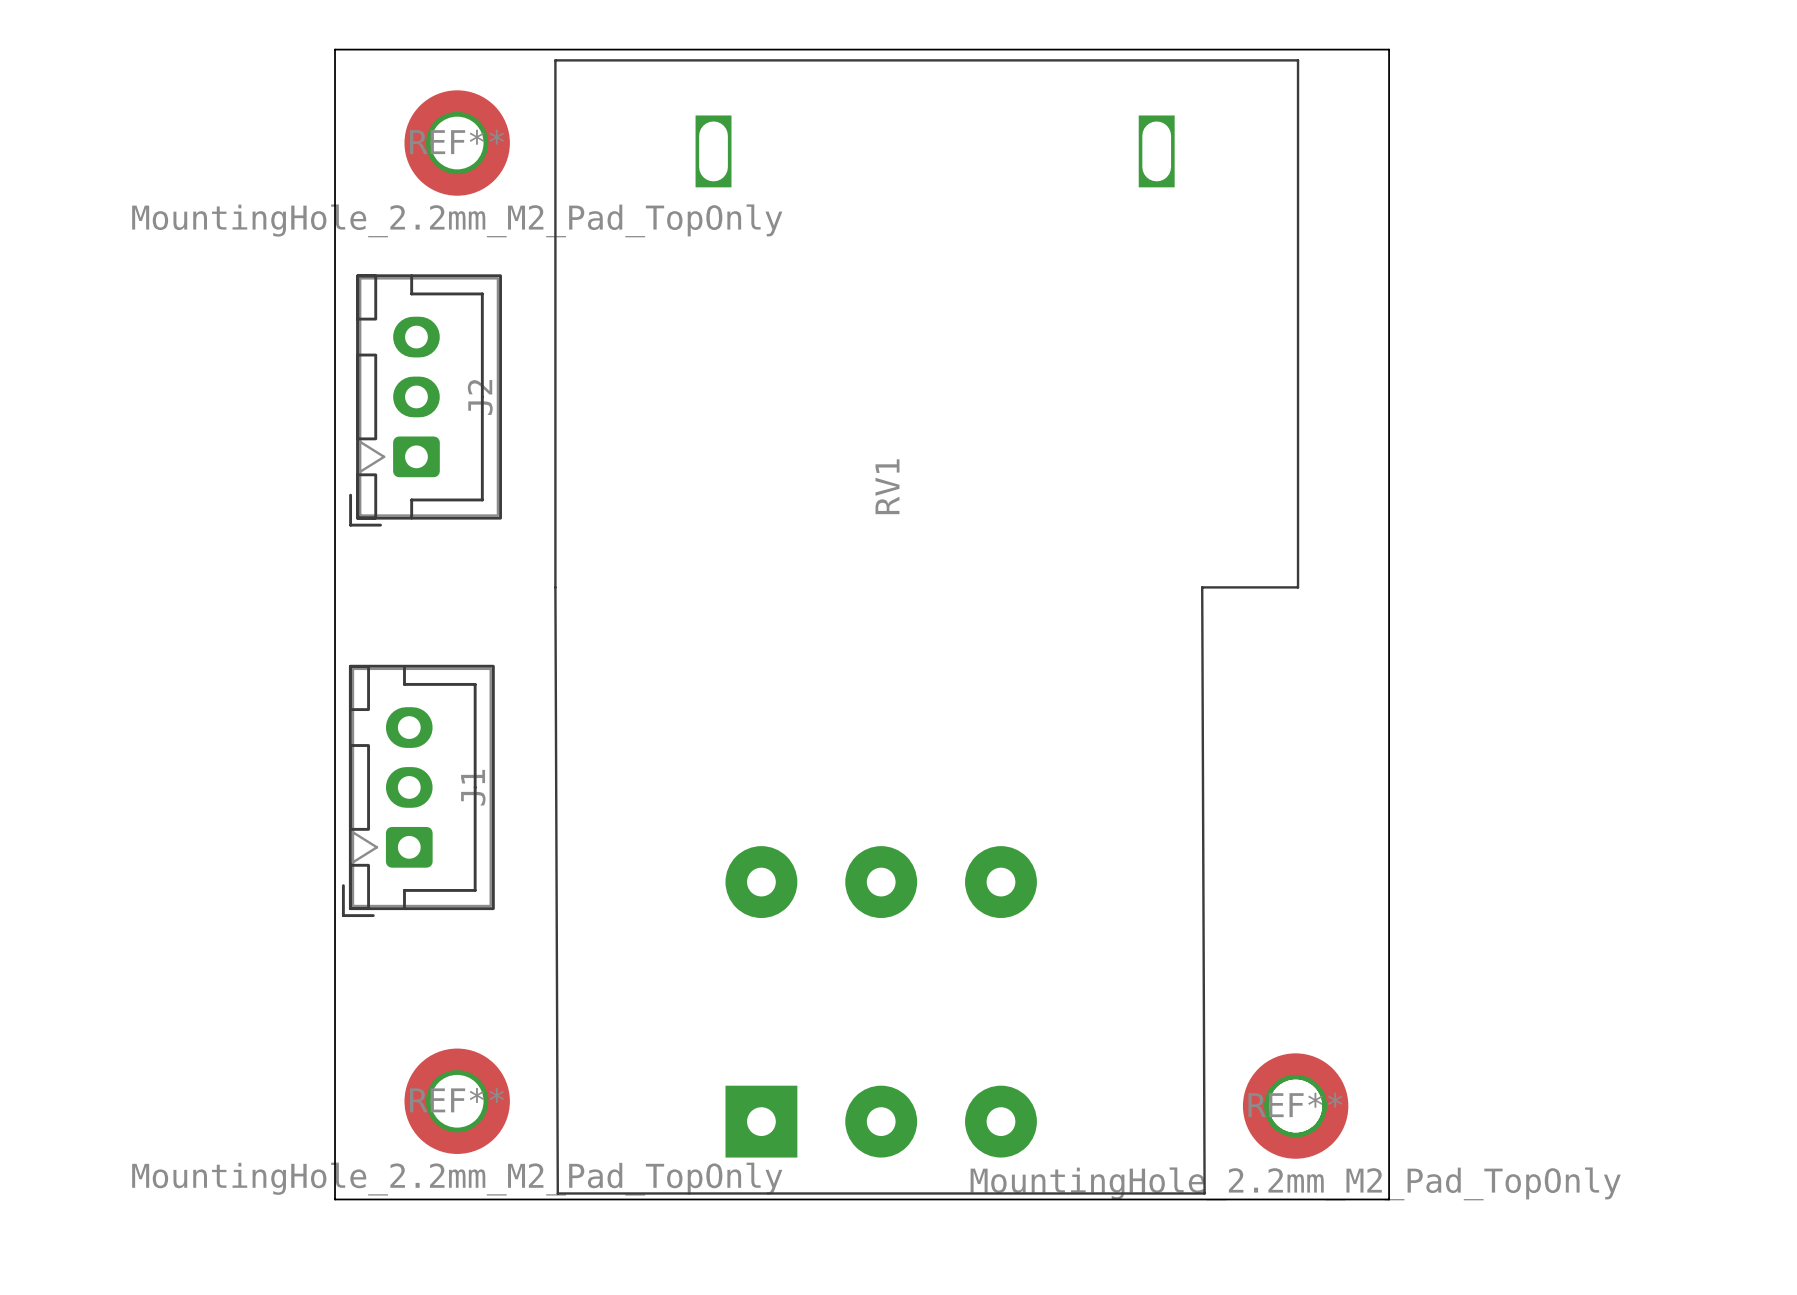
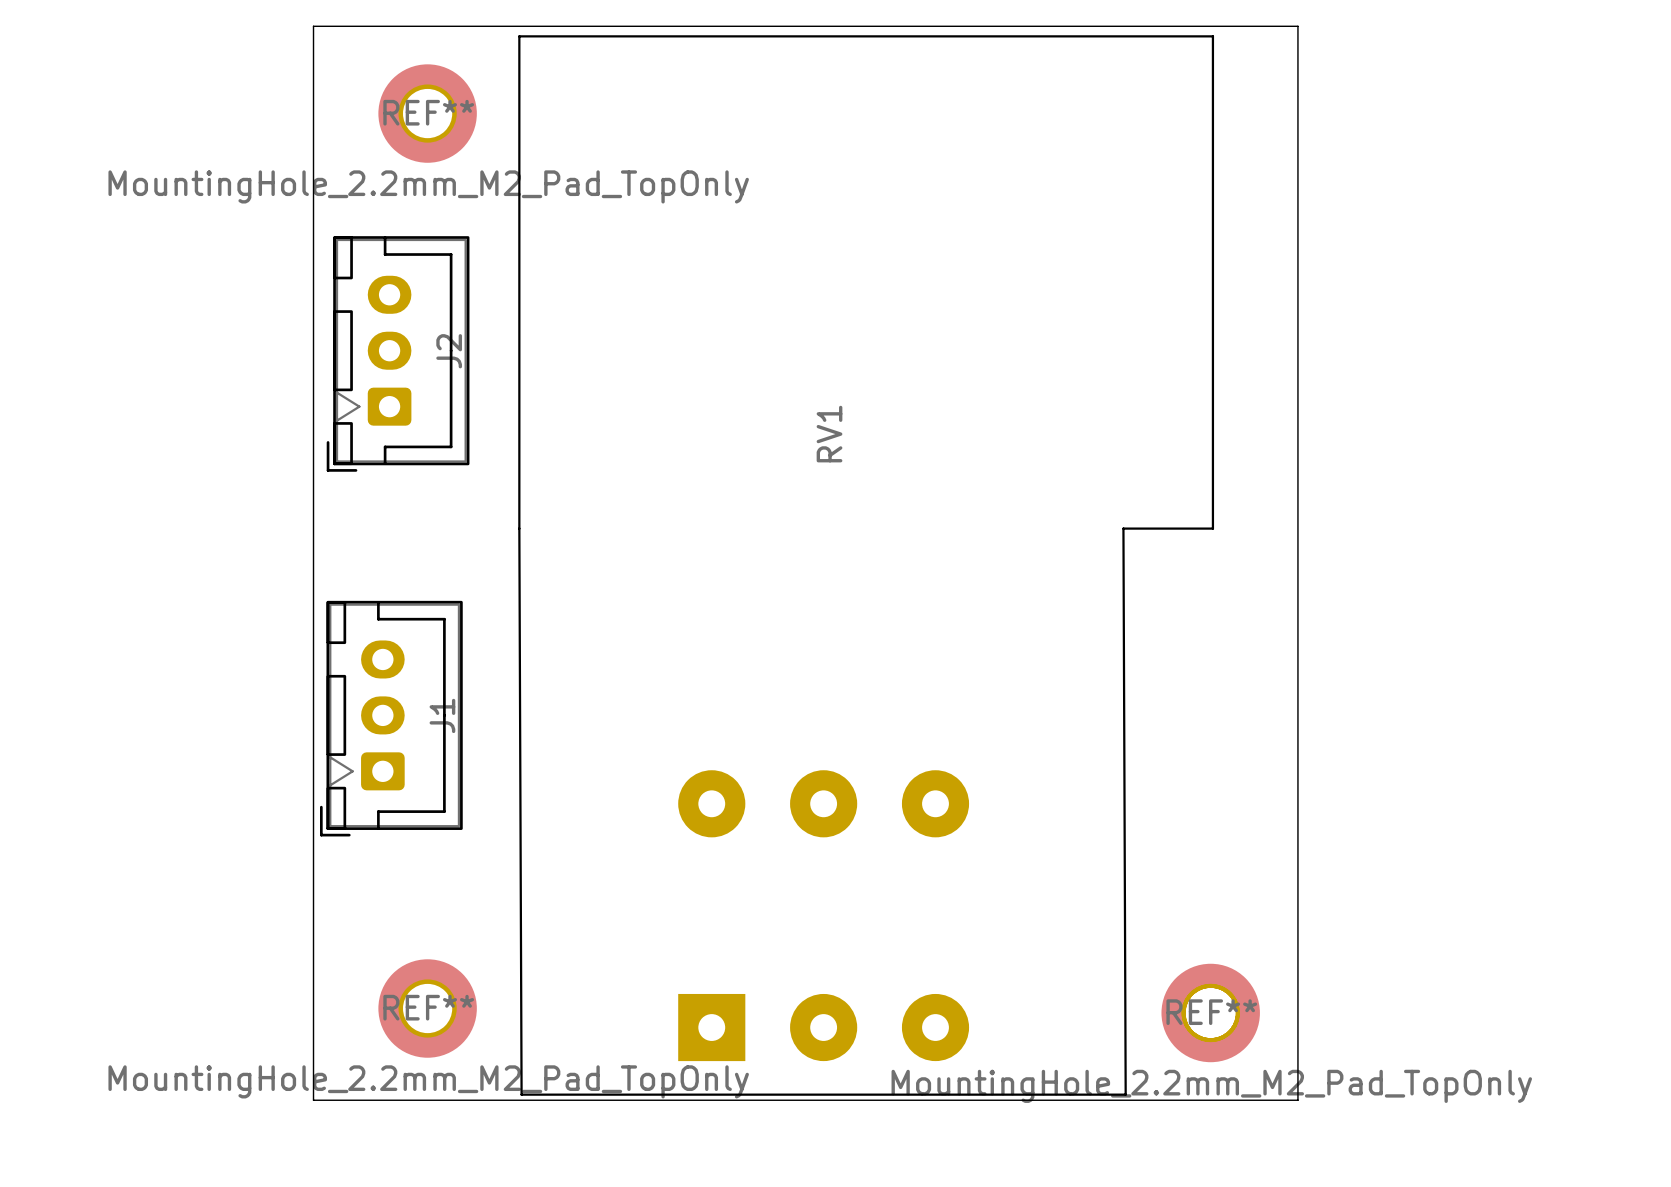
RV1 footprint: [554, 59, 1300, 1195] -> [518, 35, 1215, 1096]

